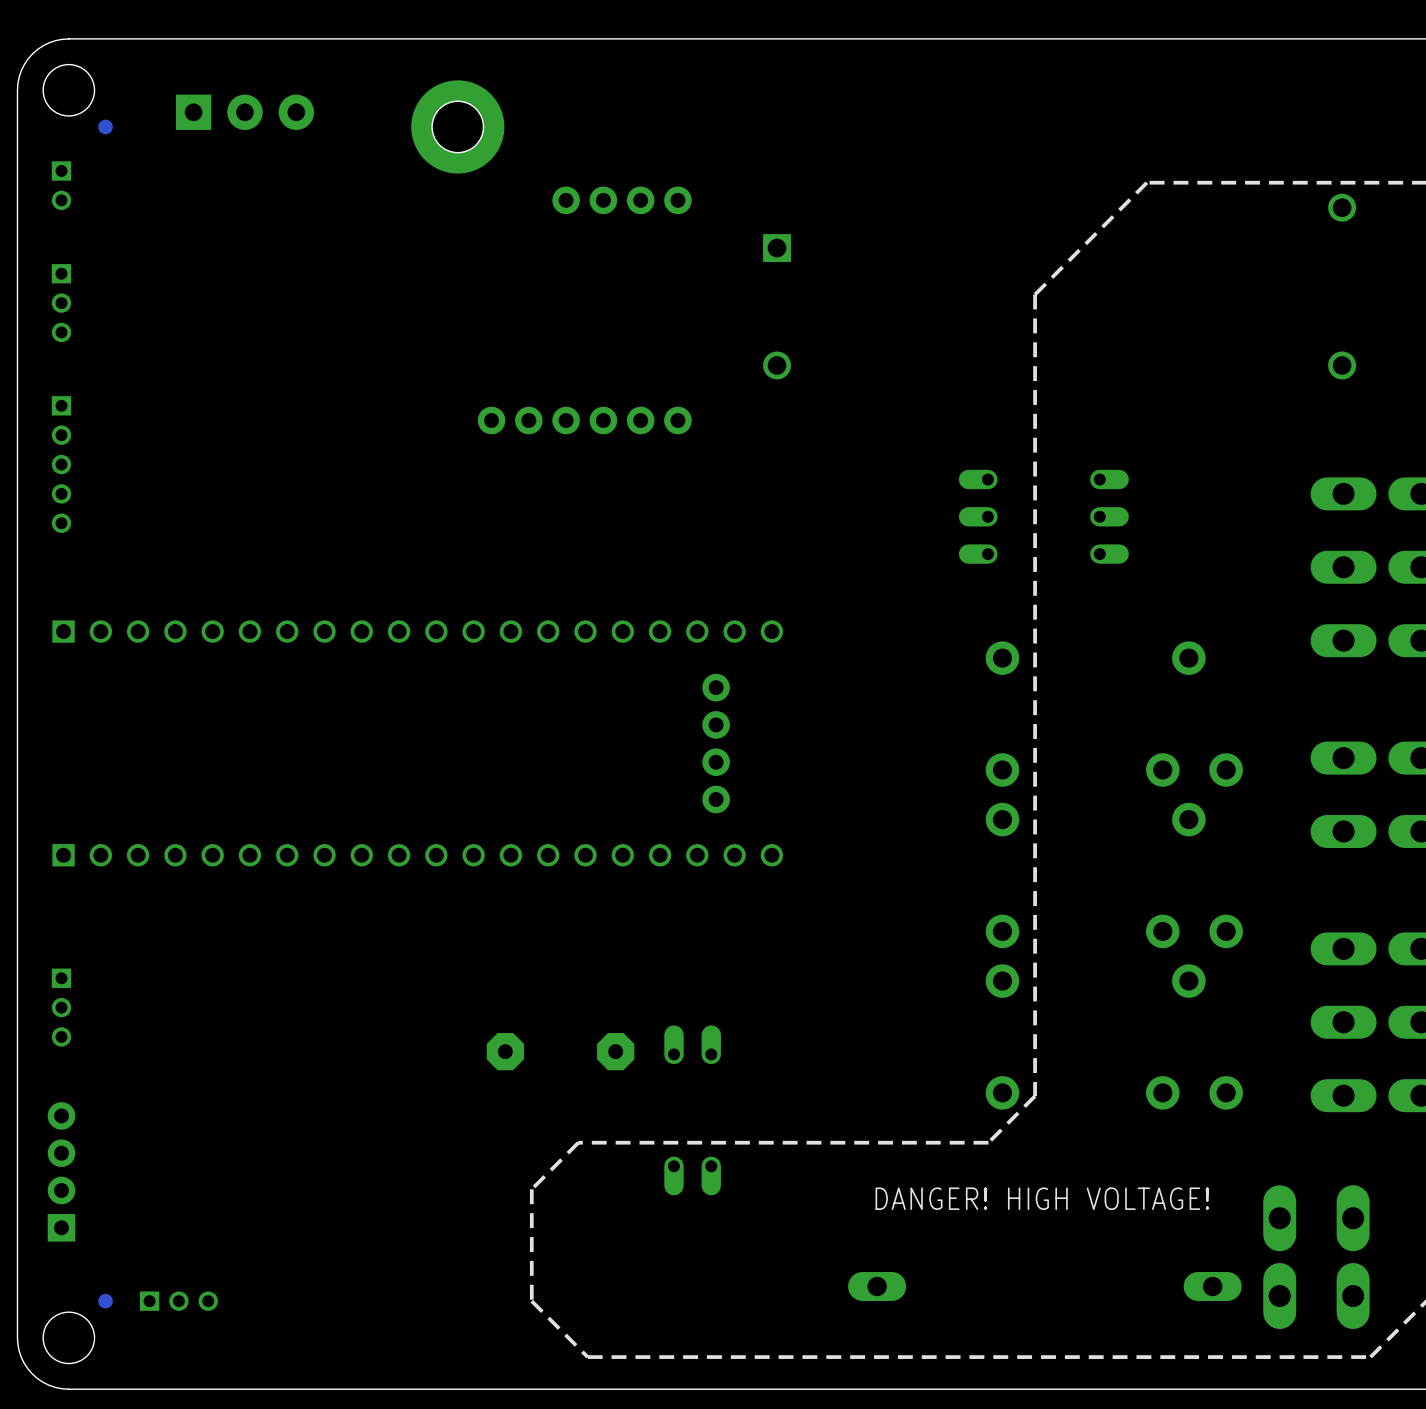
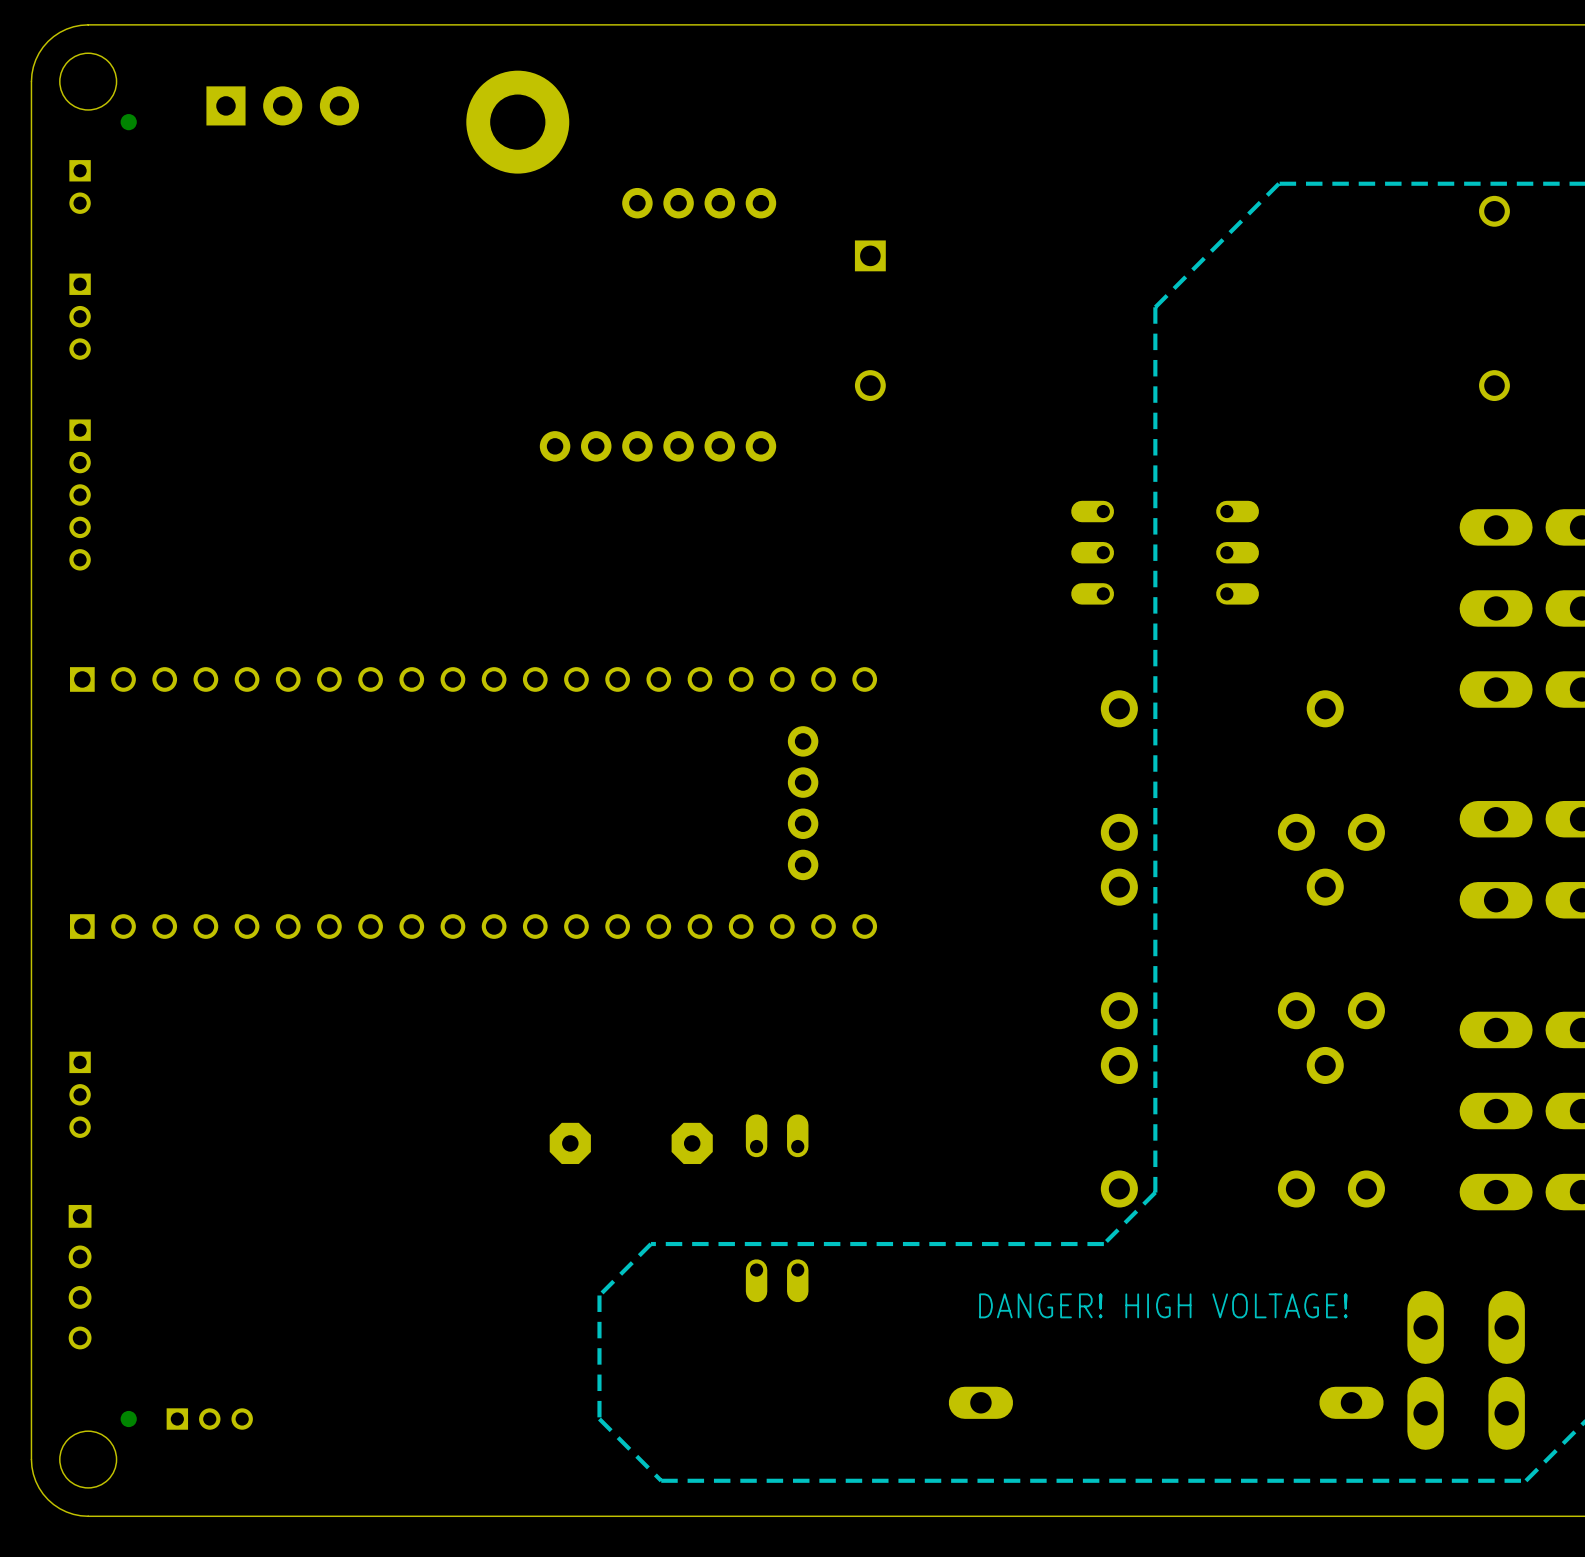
part footprint: [47, 1102, 76, 1242] -> [68, 1204, 92, 1350]

